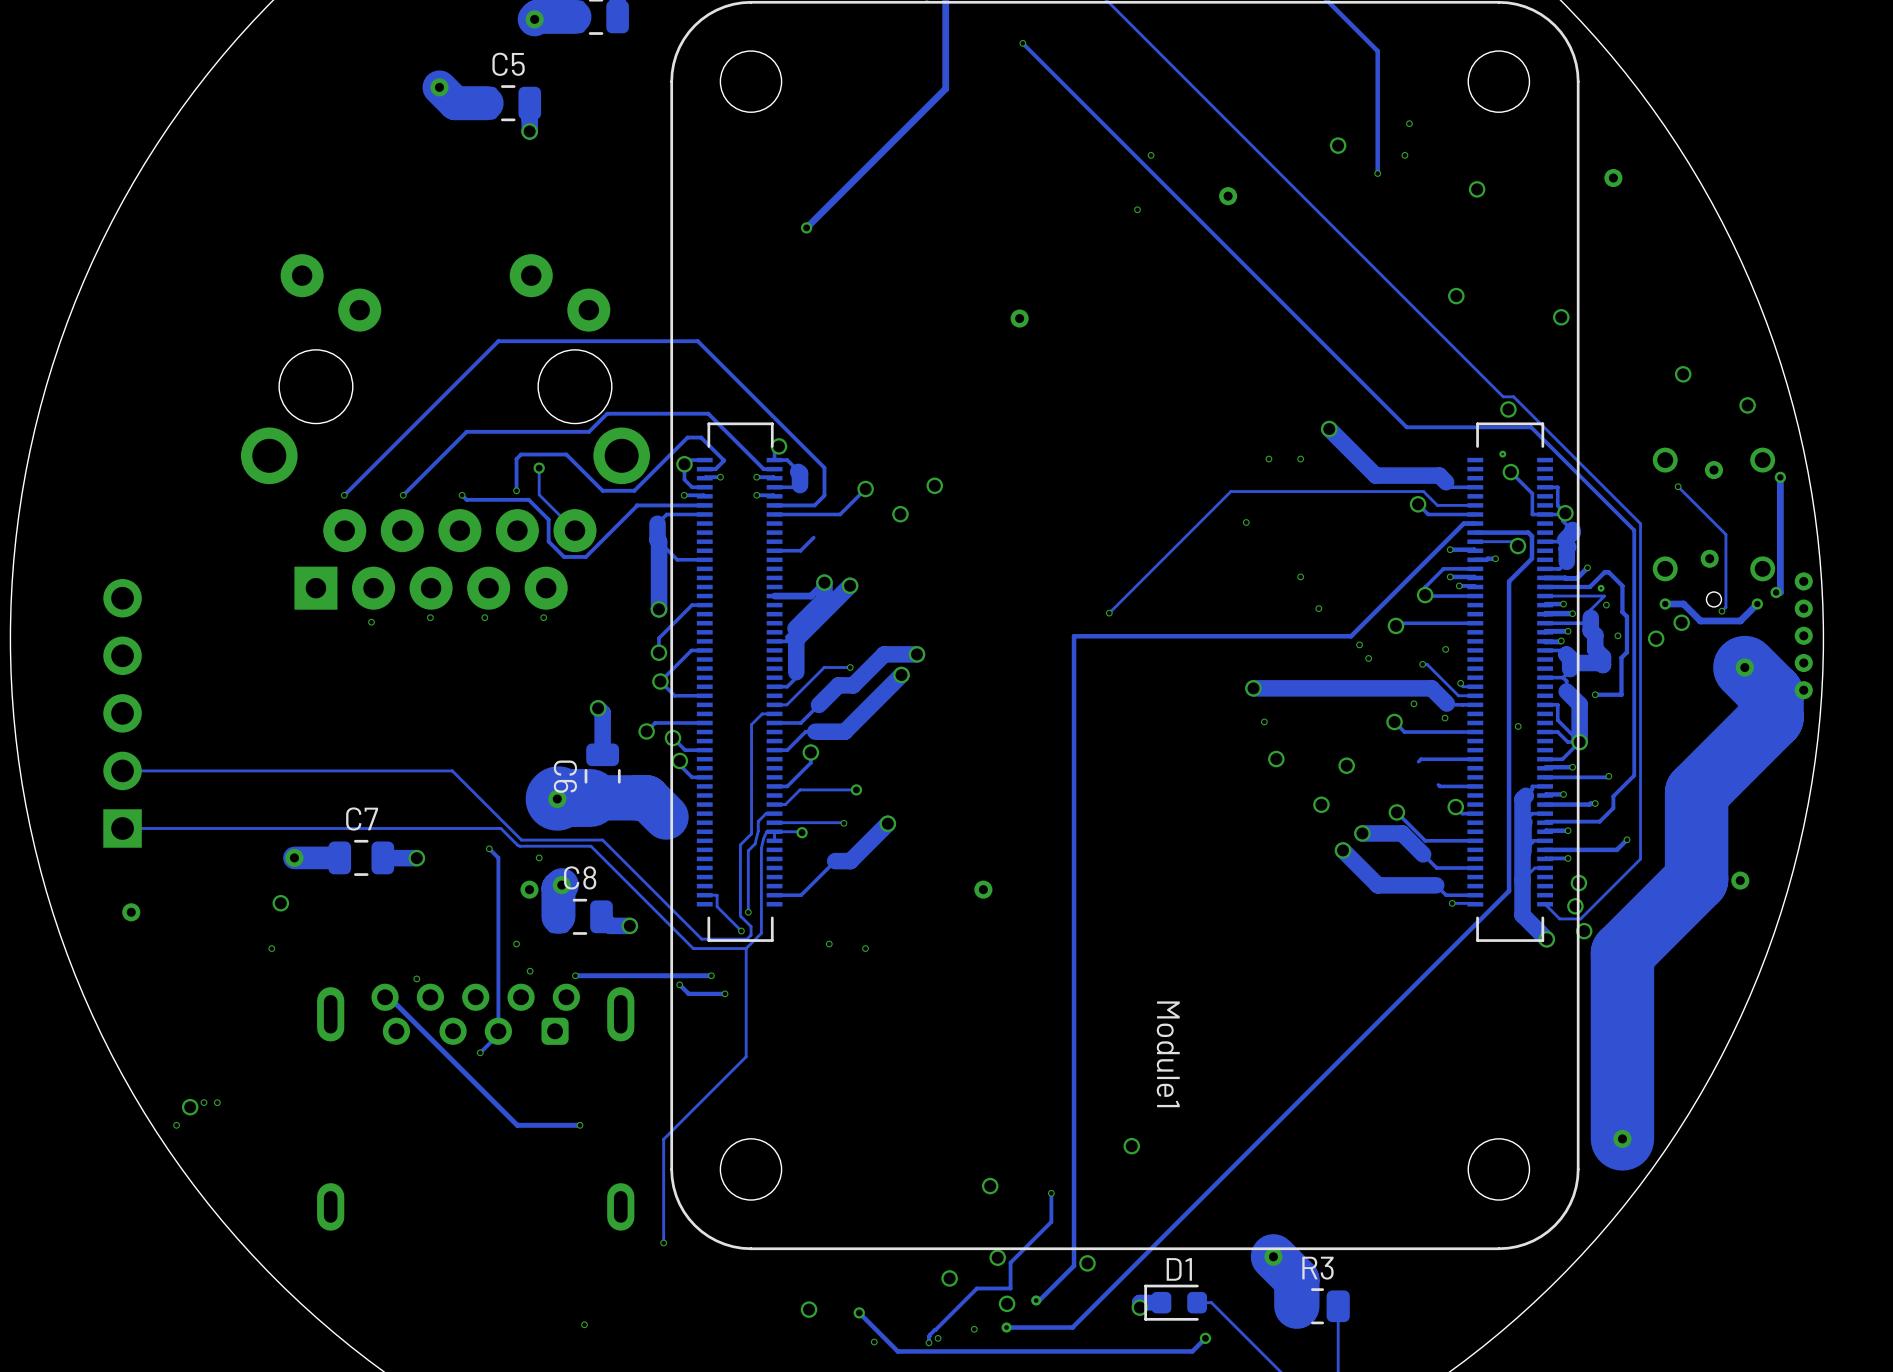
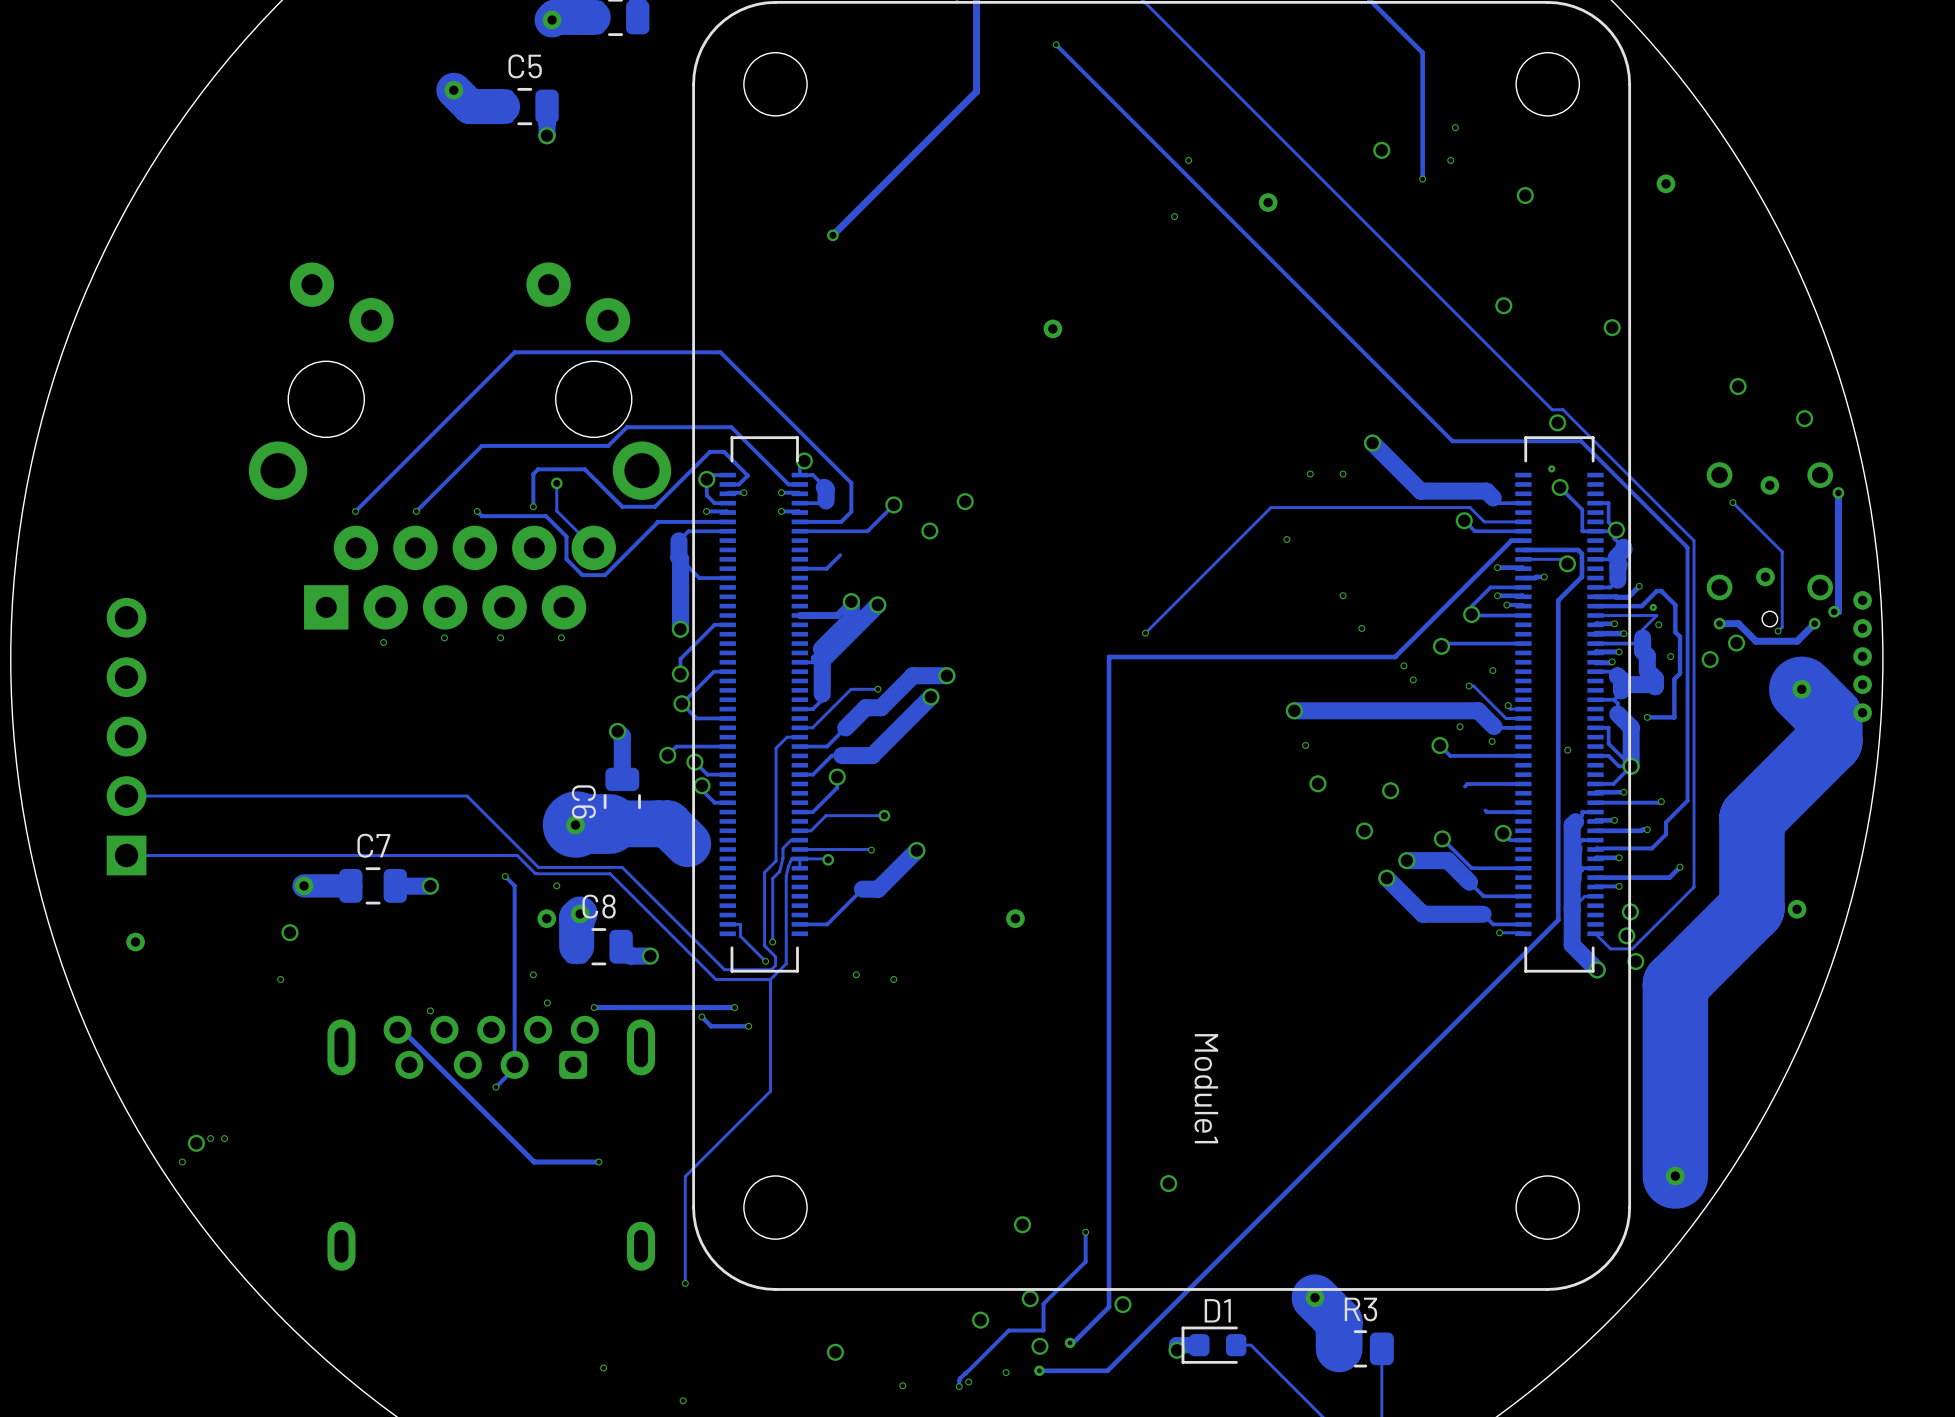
track: (859, 1312) (897, 1351) (1192, 1351) (1205, 1338) -> none
via: (859, 1312) -> none
via: (1205, 1338) -> none
via: none -> (683, 1400)

